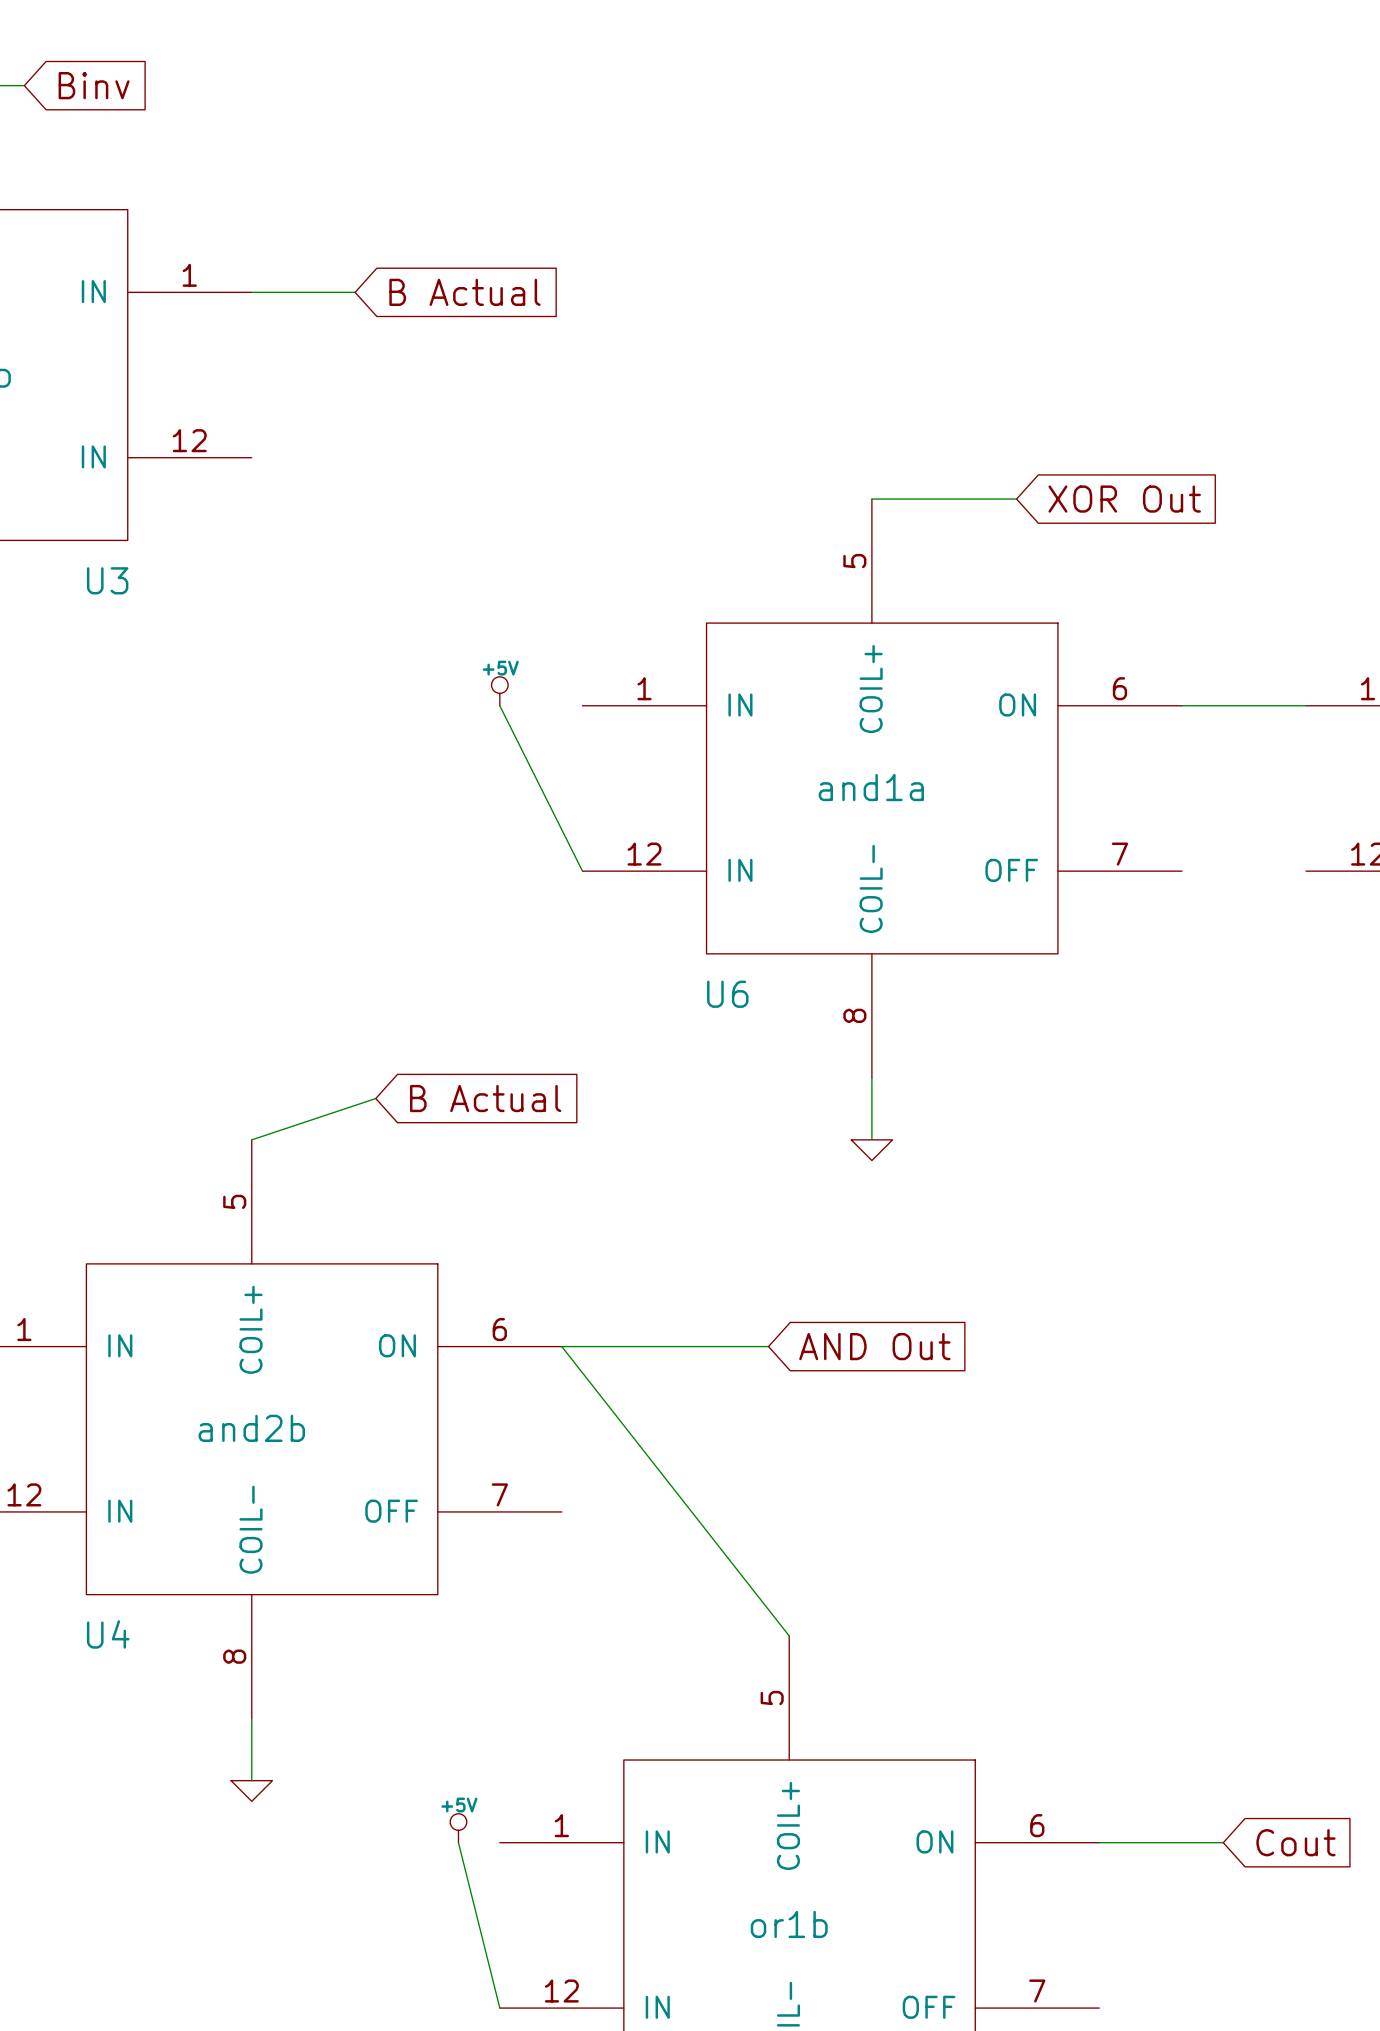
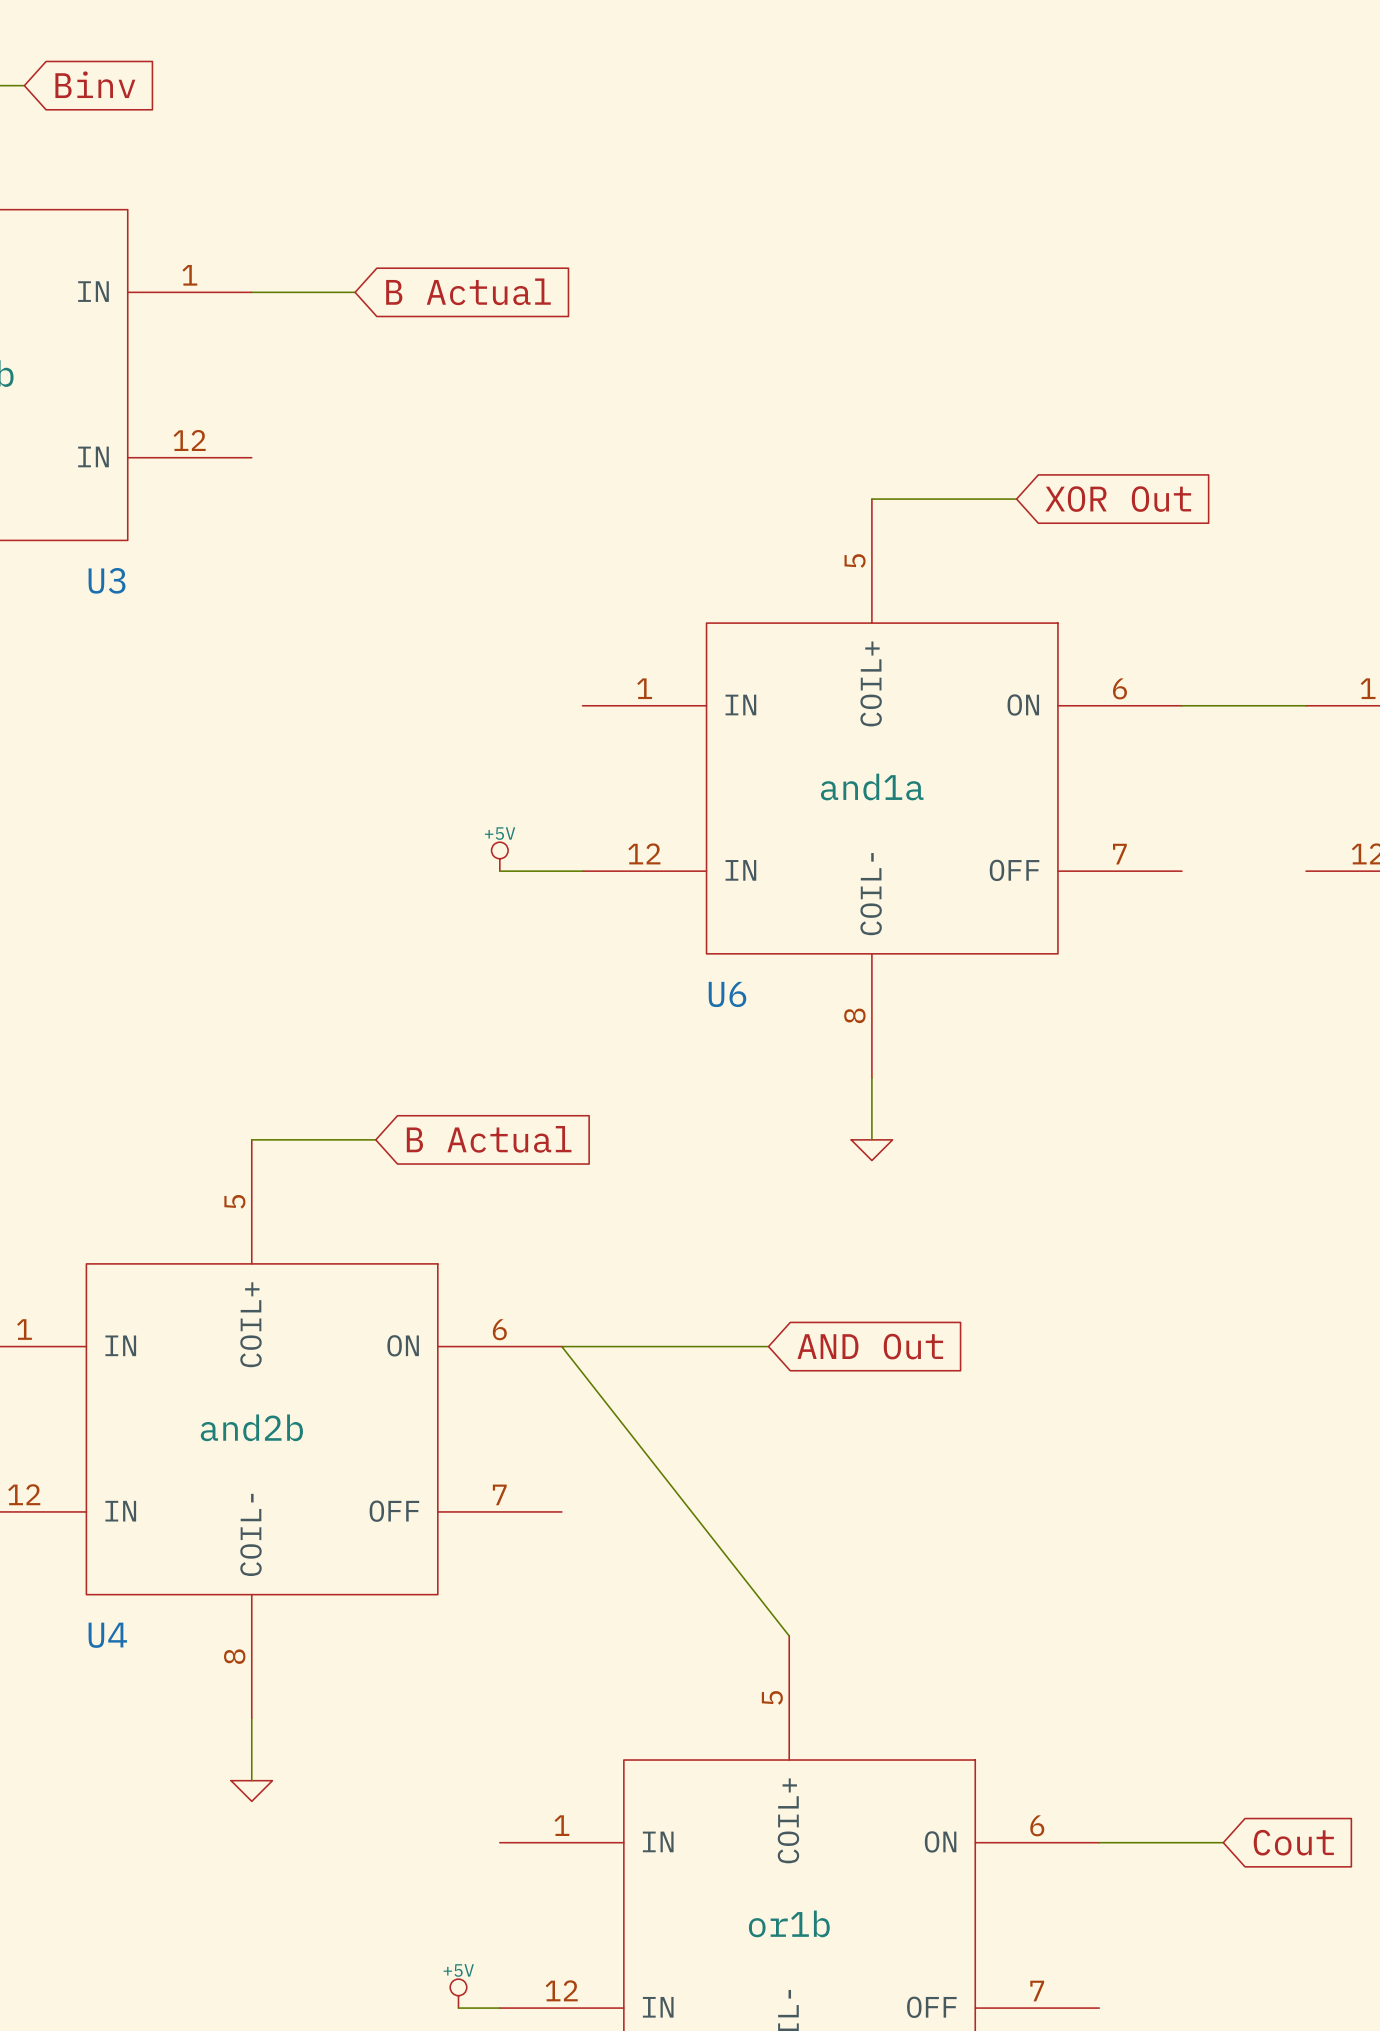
power symbol position: +5V (499, 691) -> +5V (499, 856)
wire: (499, 705) (582, 871) -> (499, 871) (582, 871)
wire: (375, 1098) (251, 1139) -> (375, 1139) (251, 1139)
global label position: B Actual (485, 1098) -> B Actual (489, 1139)
power symbol position: +5V (458, 1828) -> +5V (458, 1993)
wire: (458, 1842) (499, 2008) -> (458, 2008) (499, 2008)

